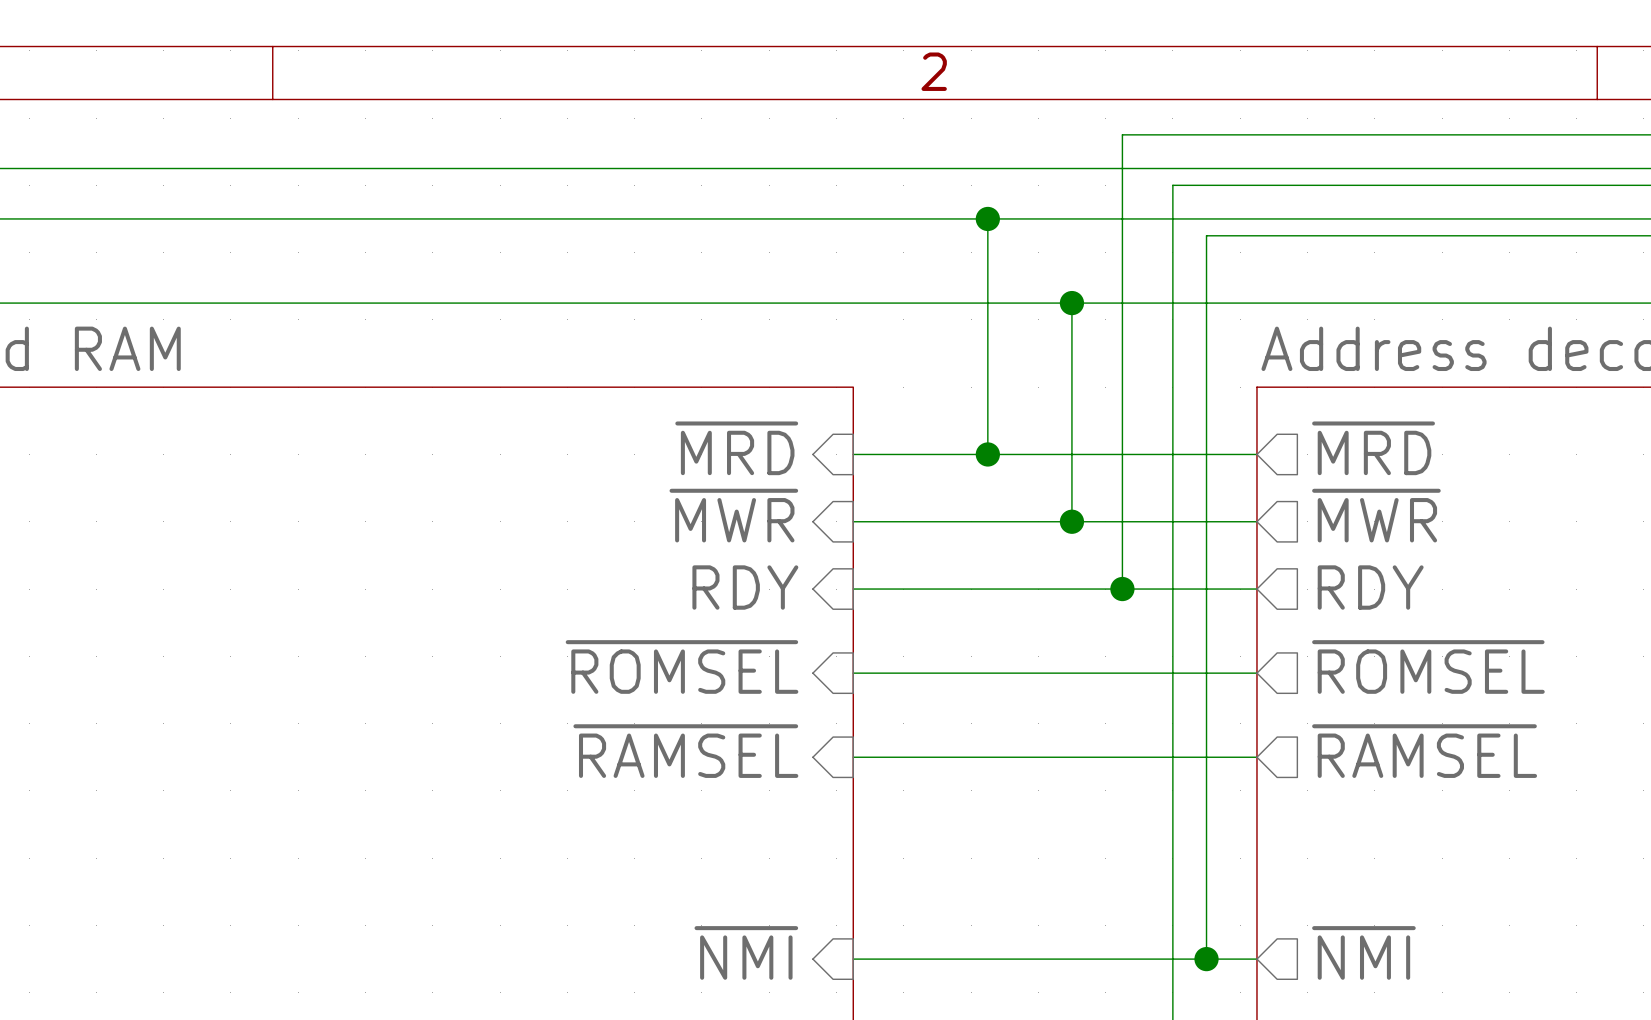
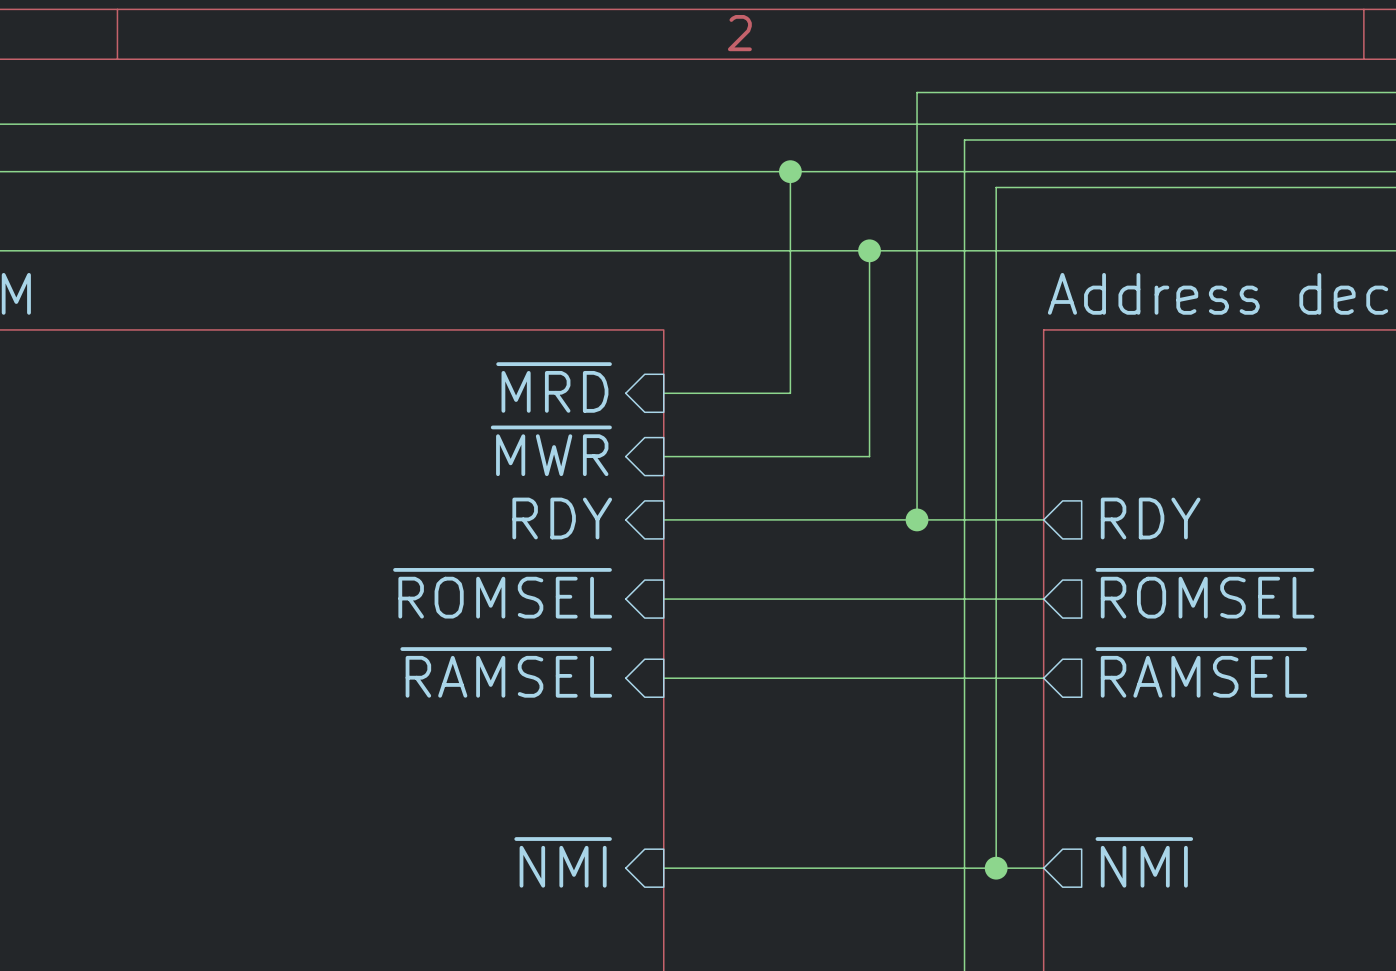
sheet pin: ~{MRD} (1373, 448) -> none
wire: (987, 454) (1256, 454) -> none
junction: (987, 454) -> none
sheet pin: ~{MWR} (1376, 515) -> none
wire: (1071, 521) (1256, 521) -> none
junction: (1071, 521) -> none

